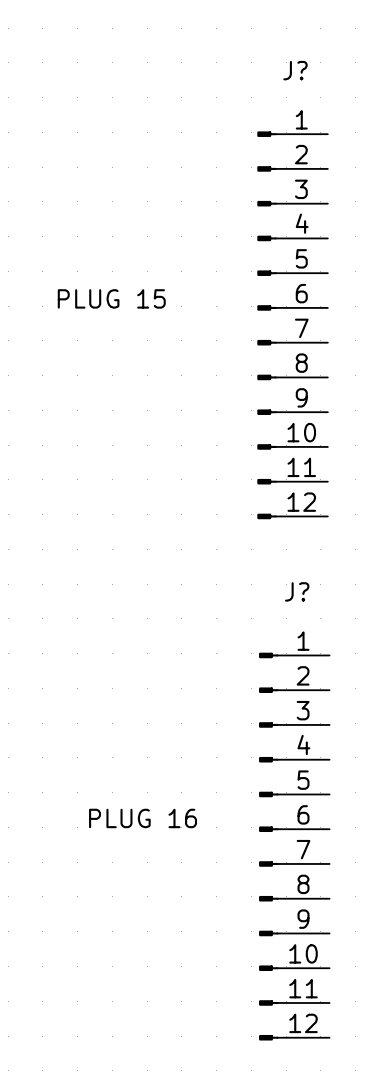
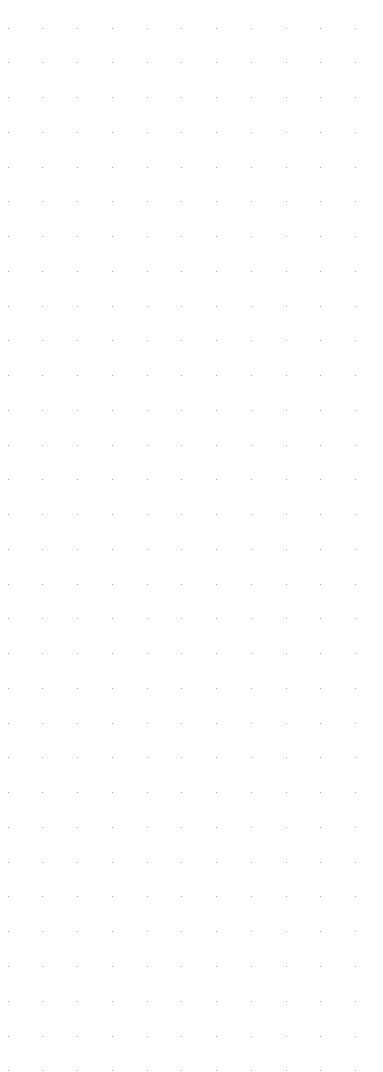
text: PLUG 15 (111, 298) -> none
J?: (292, 325) -> none
text: PLUG 16 (143, 818) -> none
J?: (294, 846) -> none

